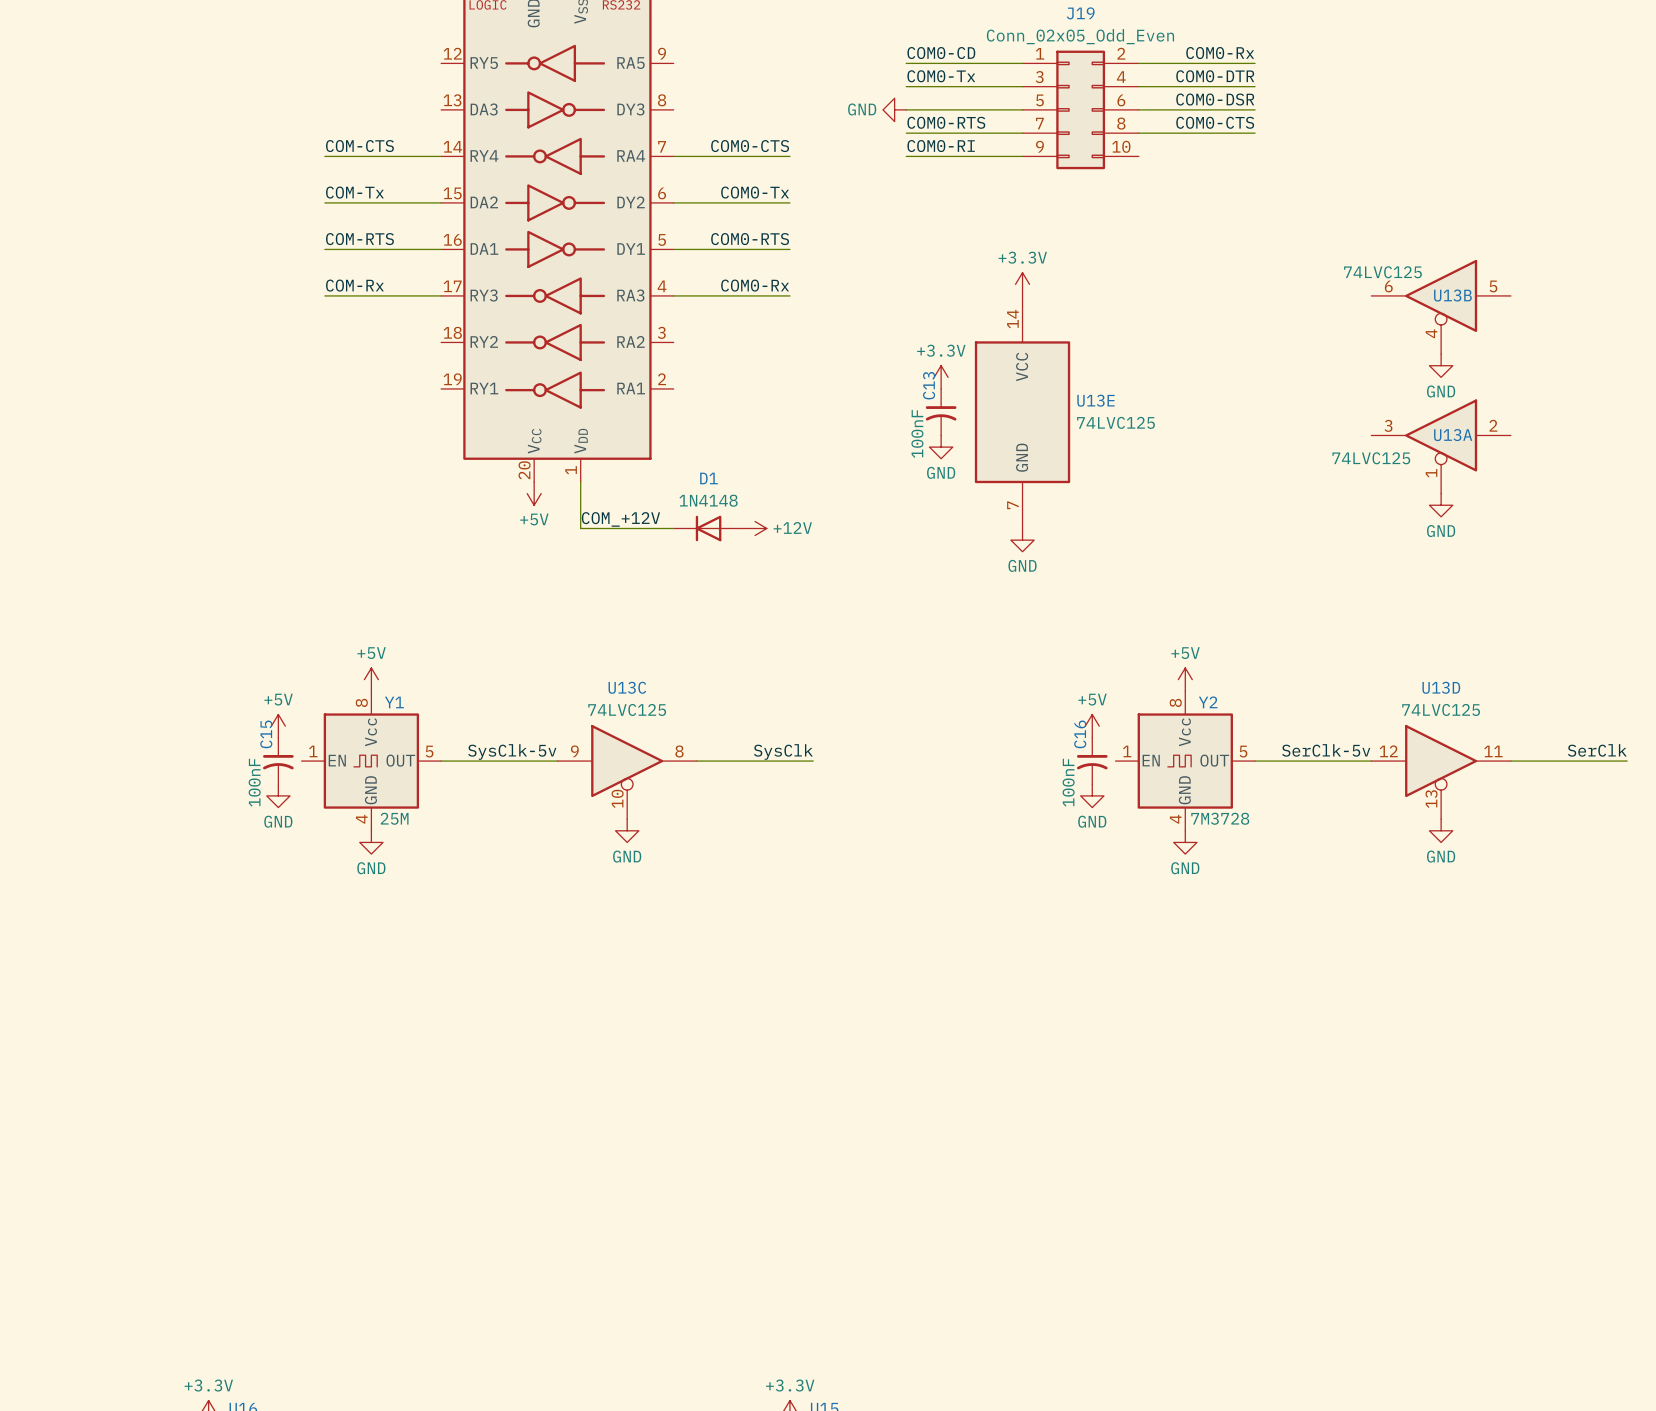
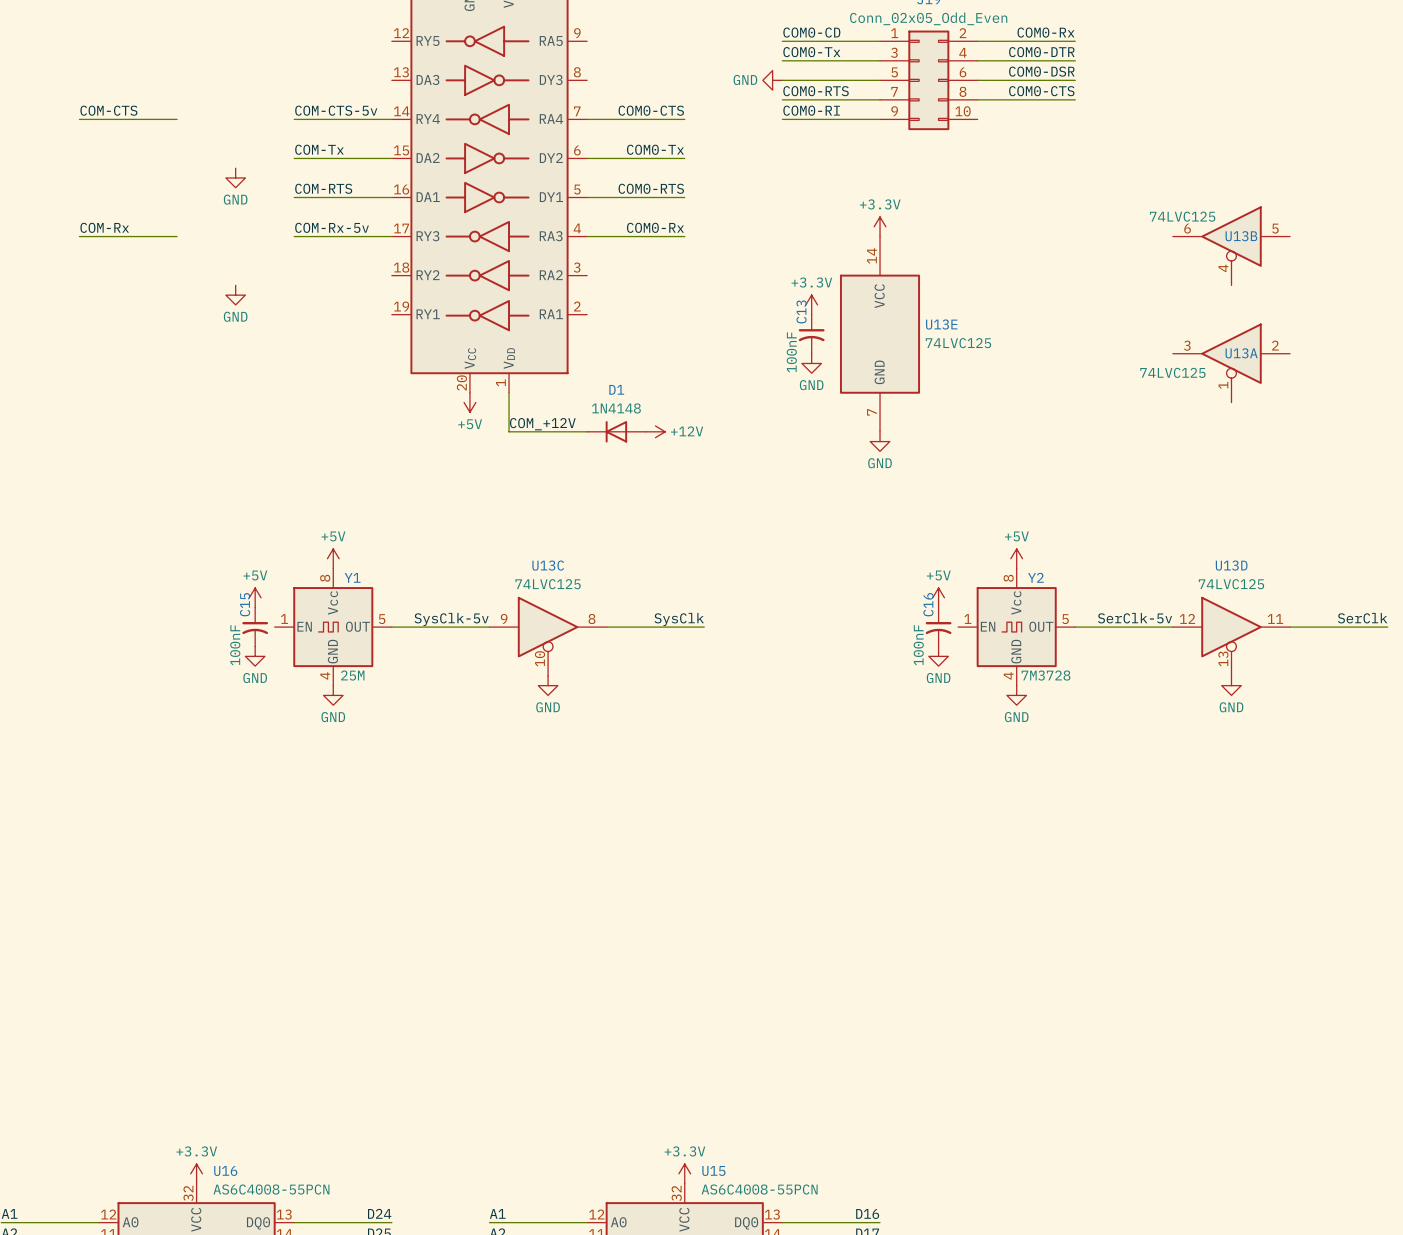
label: none -> COM-CTS (108, 110)
label: COM-CTS (359, 146) -> COM-CTS-5v (336, 110)
wire: none -> (79, 119) (177, 119)
power symbol: none -> GND (235, 177)
label: none -> COM-Rx (104, 227)
label: COM-Rx (354, 285) -> COM-Rx-5v (332, 227)
wire: none -> (79, 236) (177, 236)
power symbol: none -> GND (235, 295)
power symbol: GND (1441, 365) -> none
power symbol: GND (1441, 505) -> none

